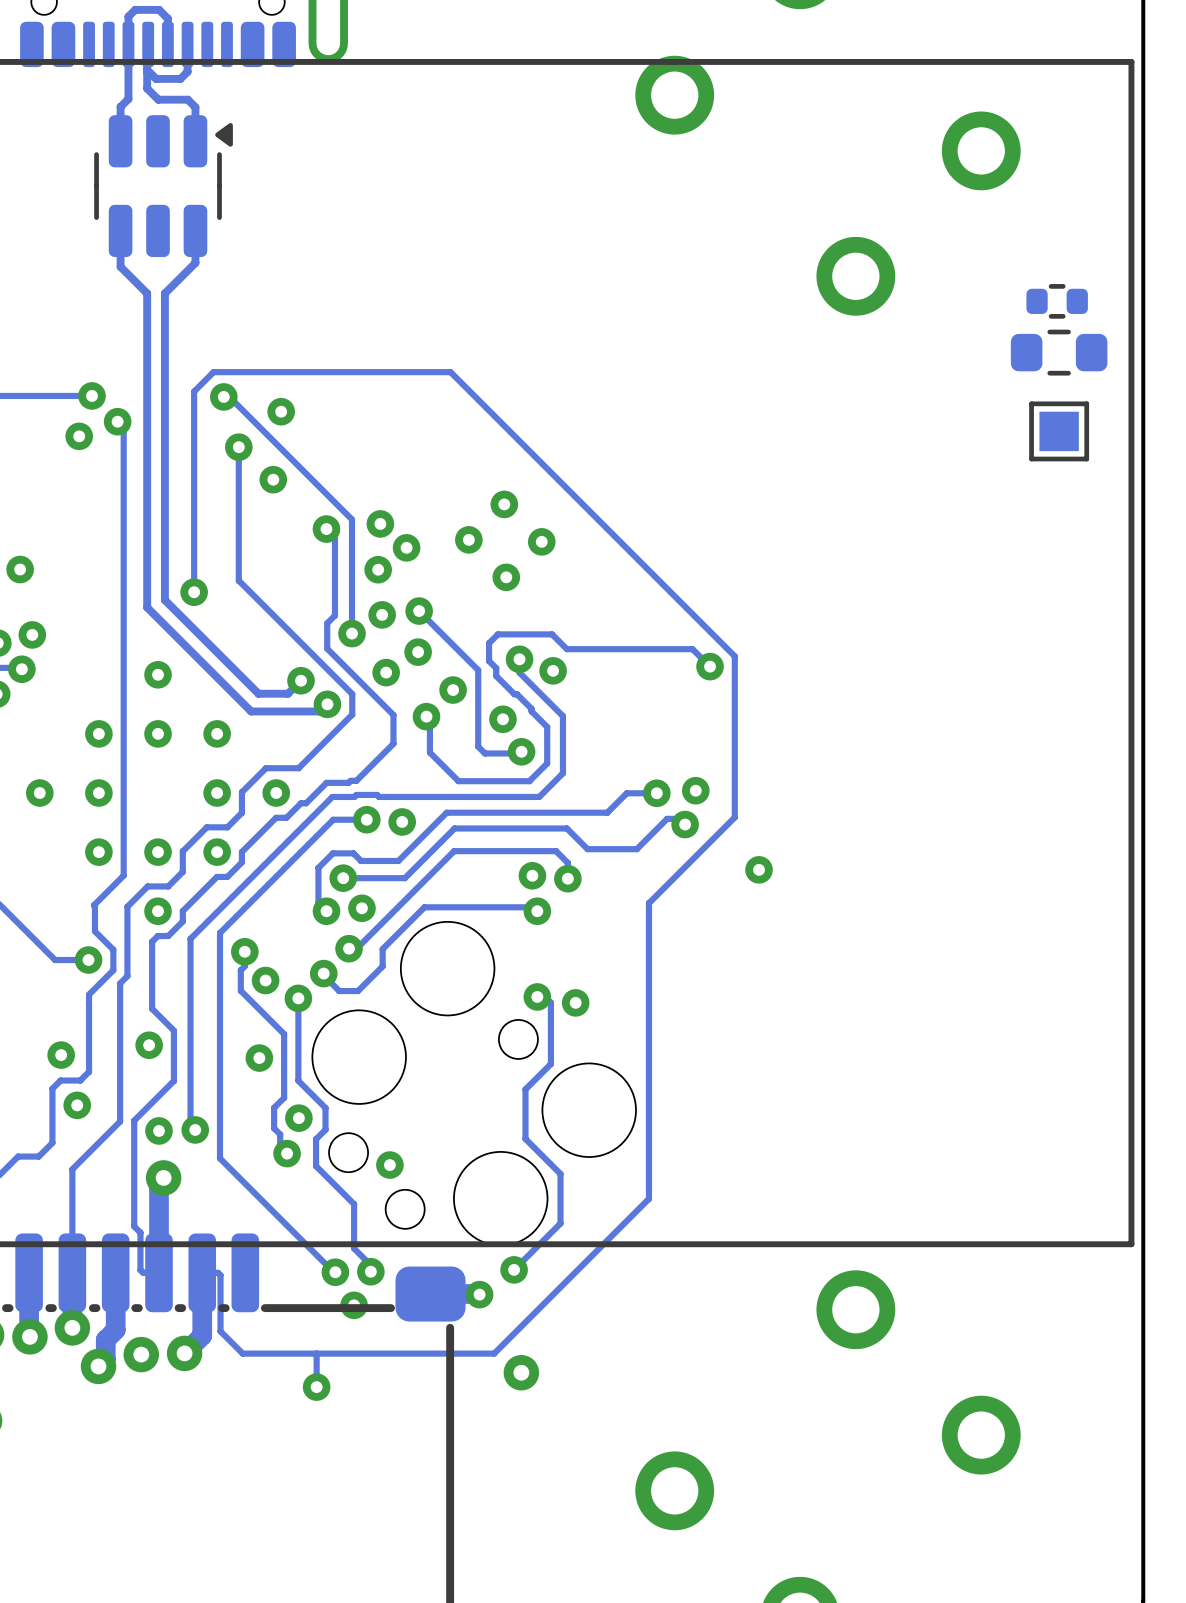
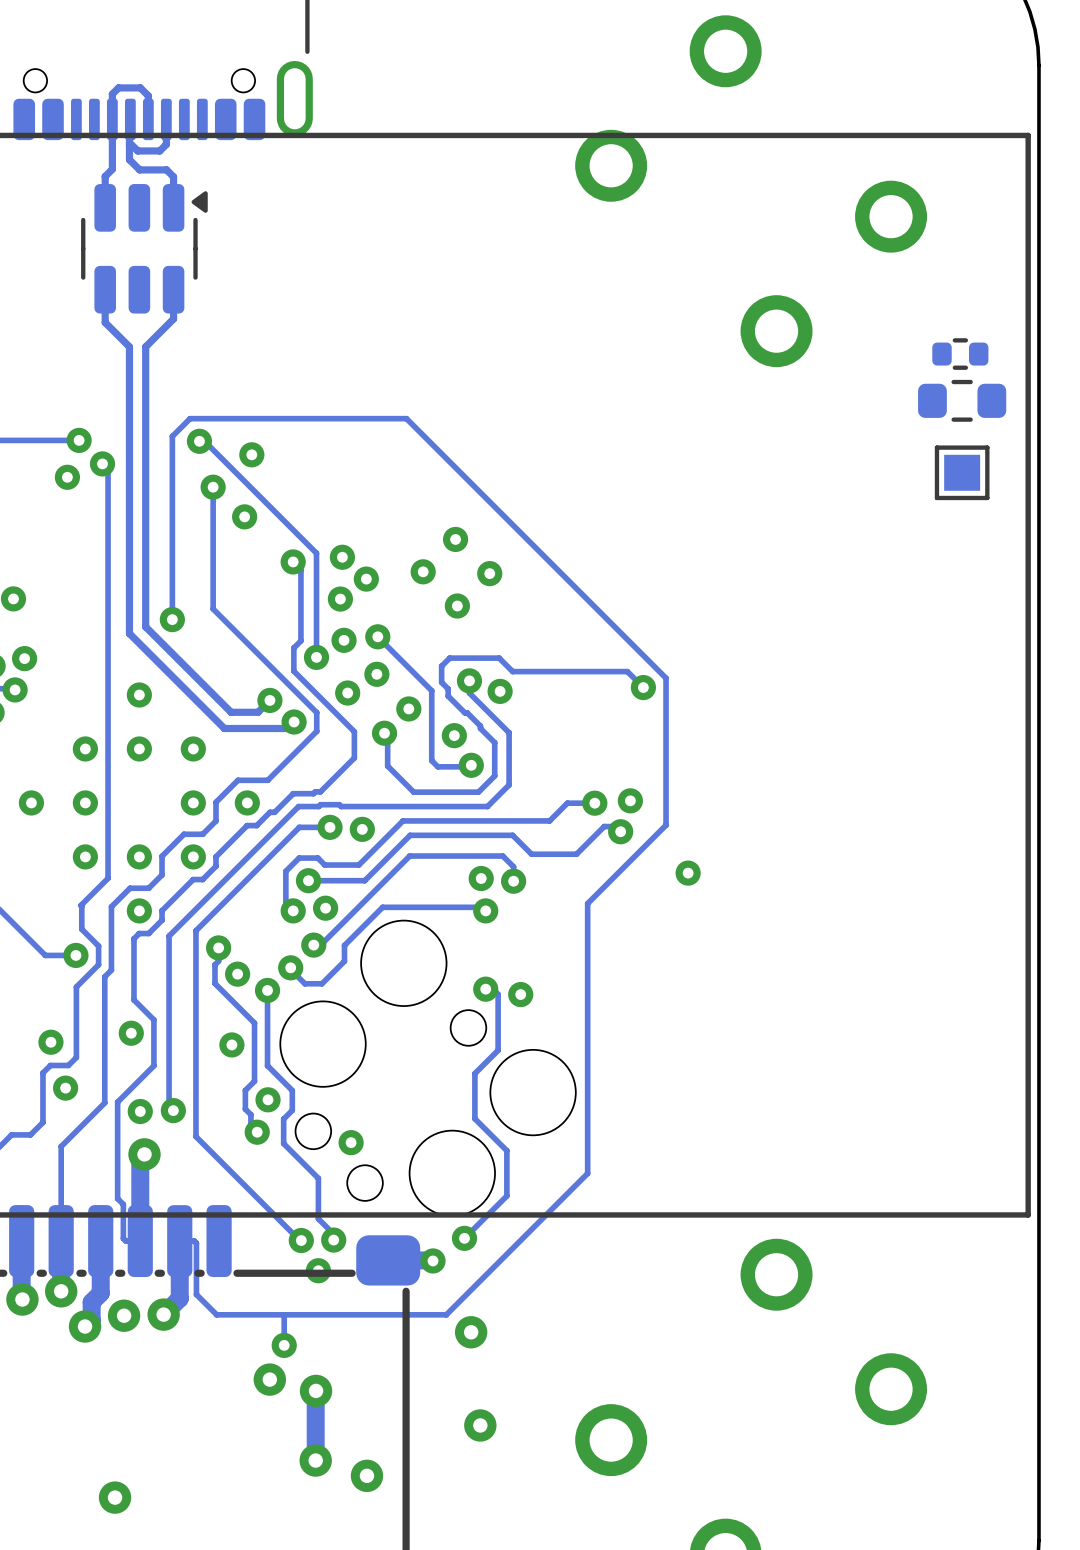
via: none -> (269, 1379)
via: none -> (316, 1390)
track: none -> (315, 1391) (315, 1460)
via: none -> (480, 1425)
via: none -> (315, 1460)
via: none -> (366, 1475)
via: none -> (115, 1497)

